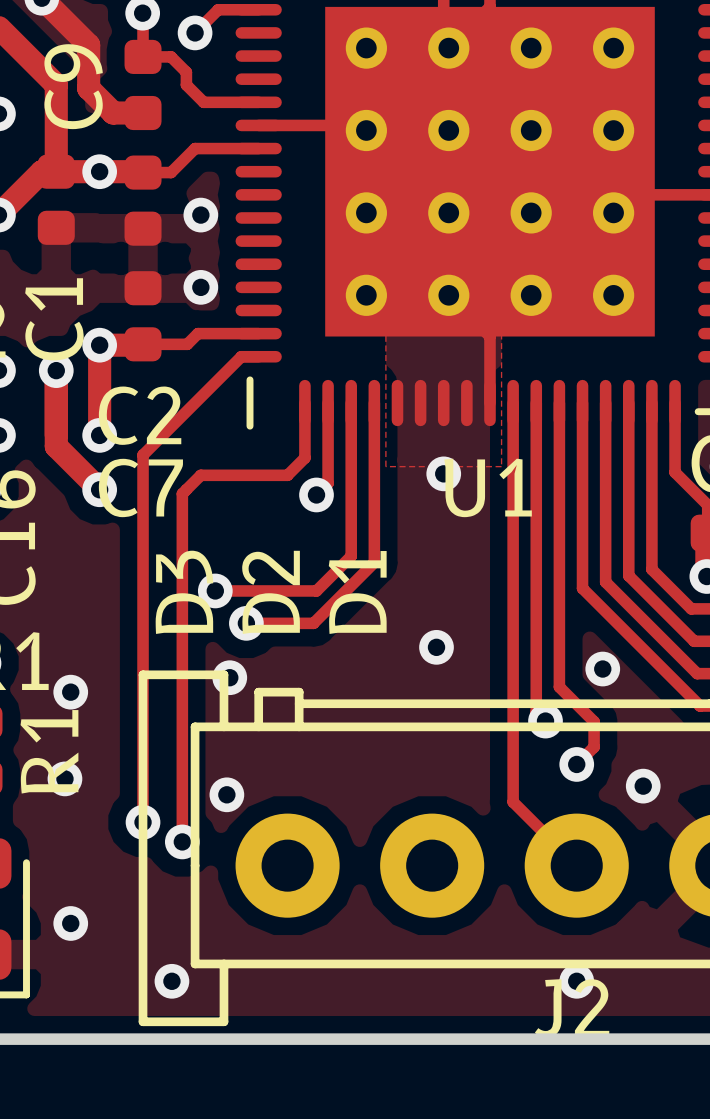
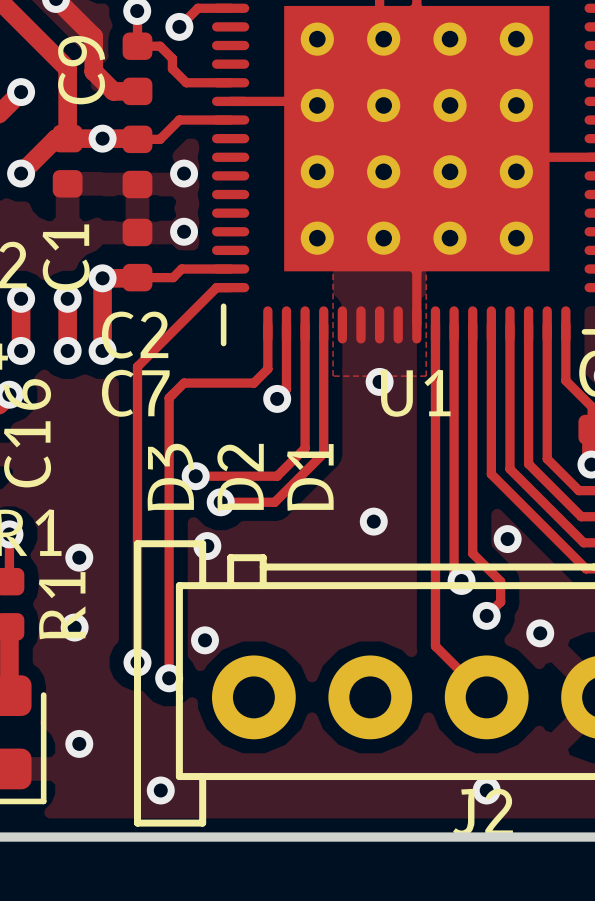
track: (56, 435) (56, 446) (99, 489) -> none
via position: (99, 489) -> (67, 350)

